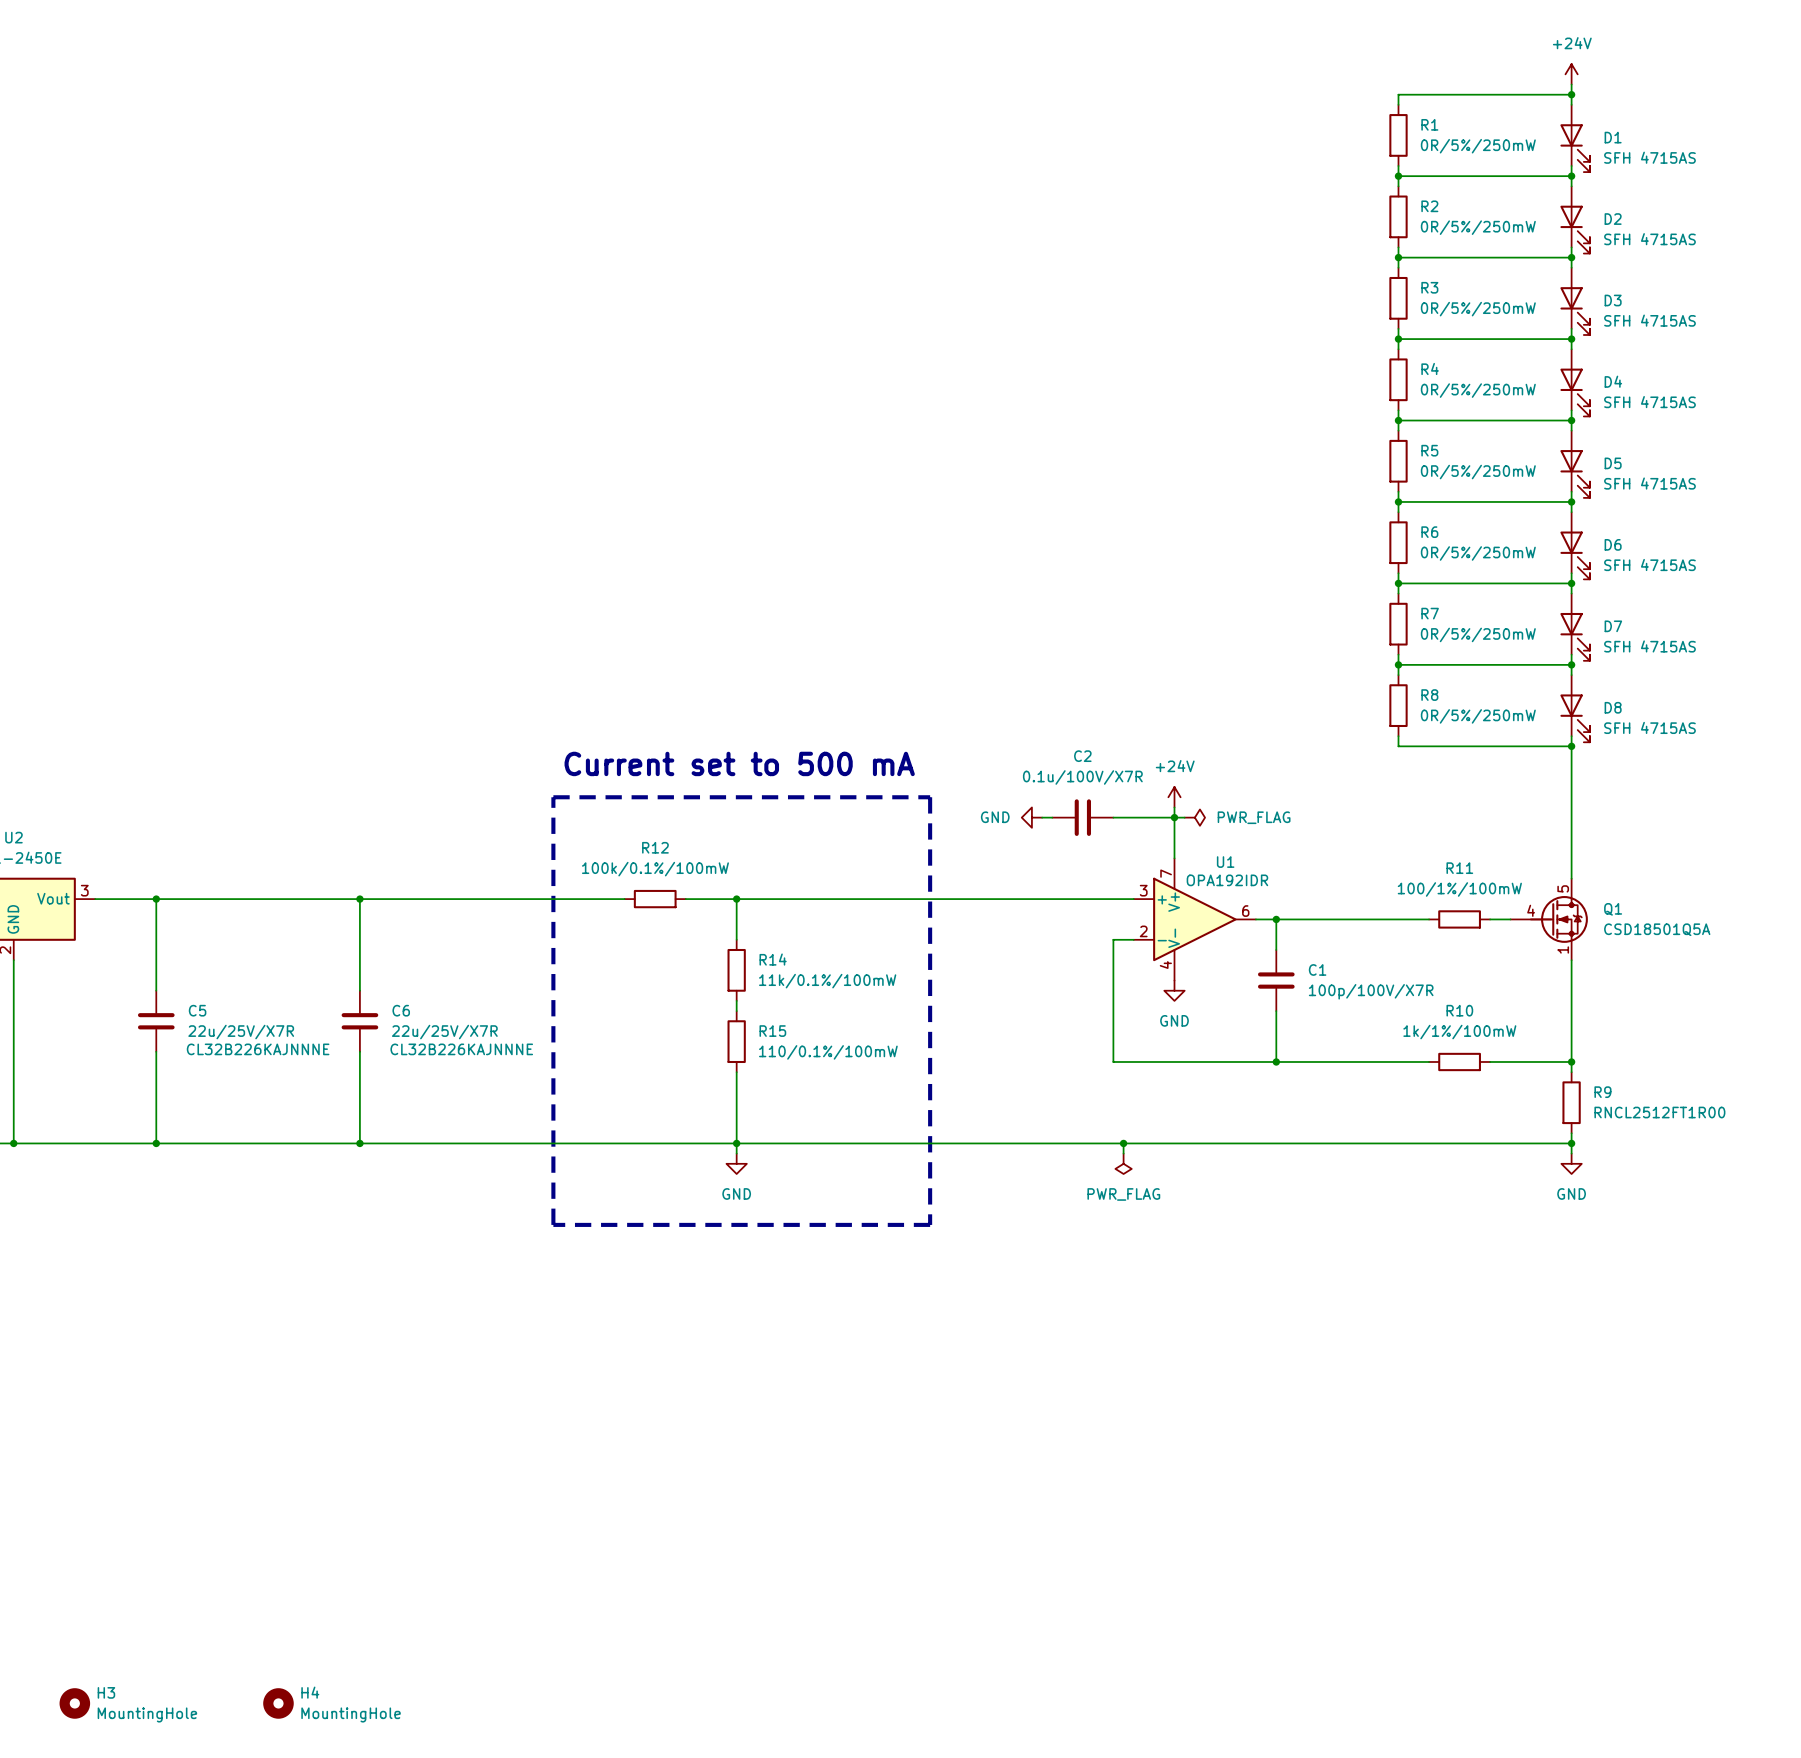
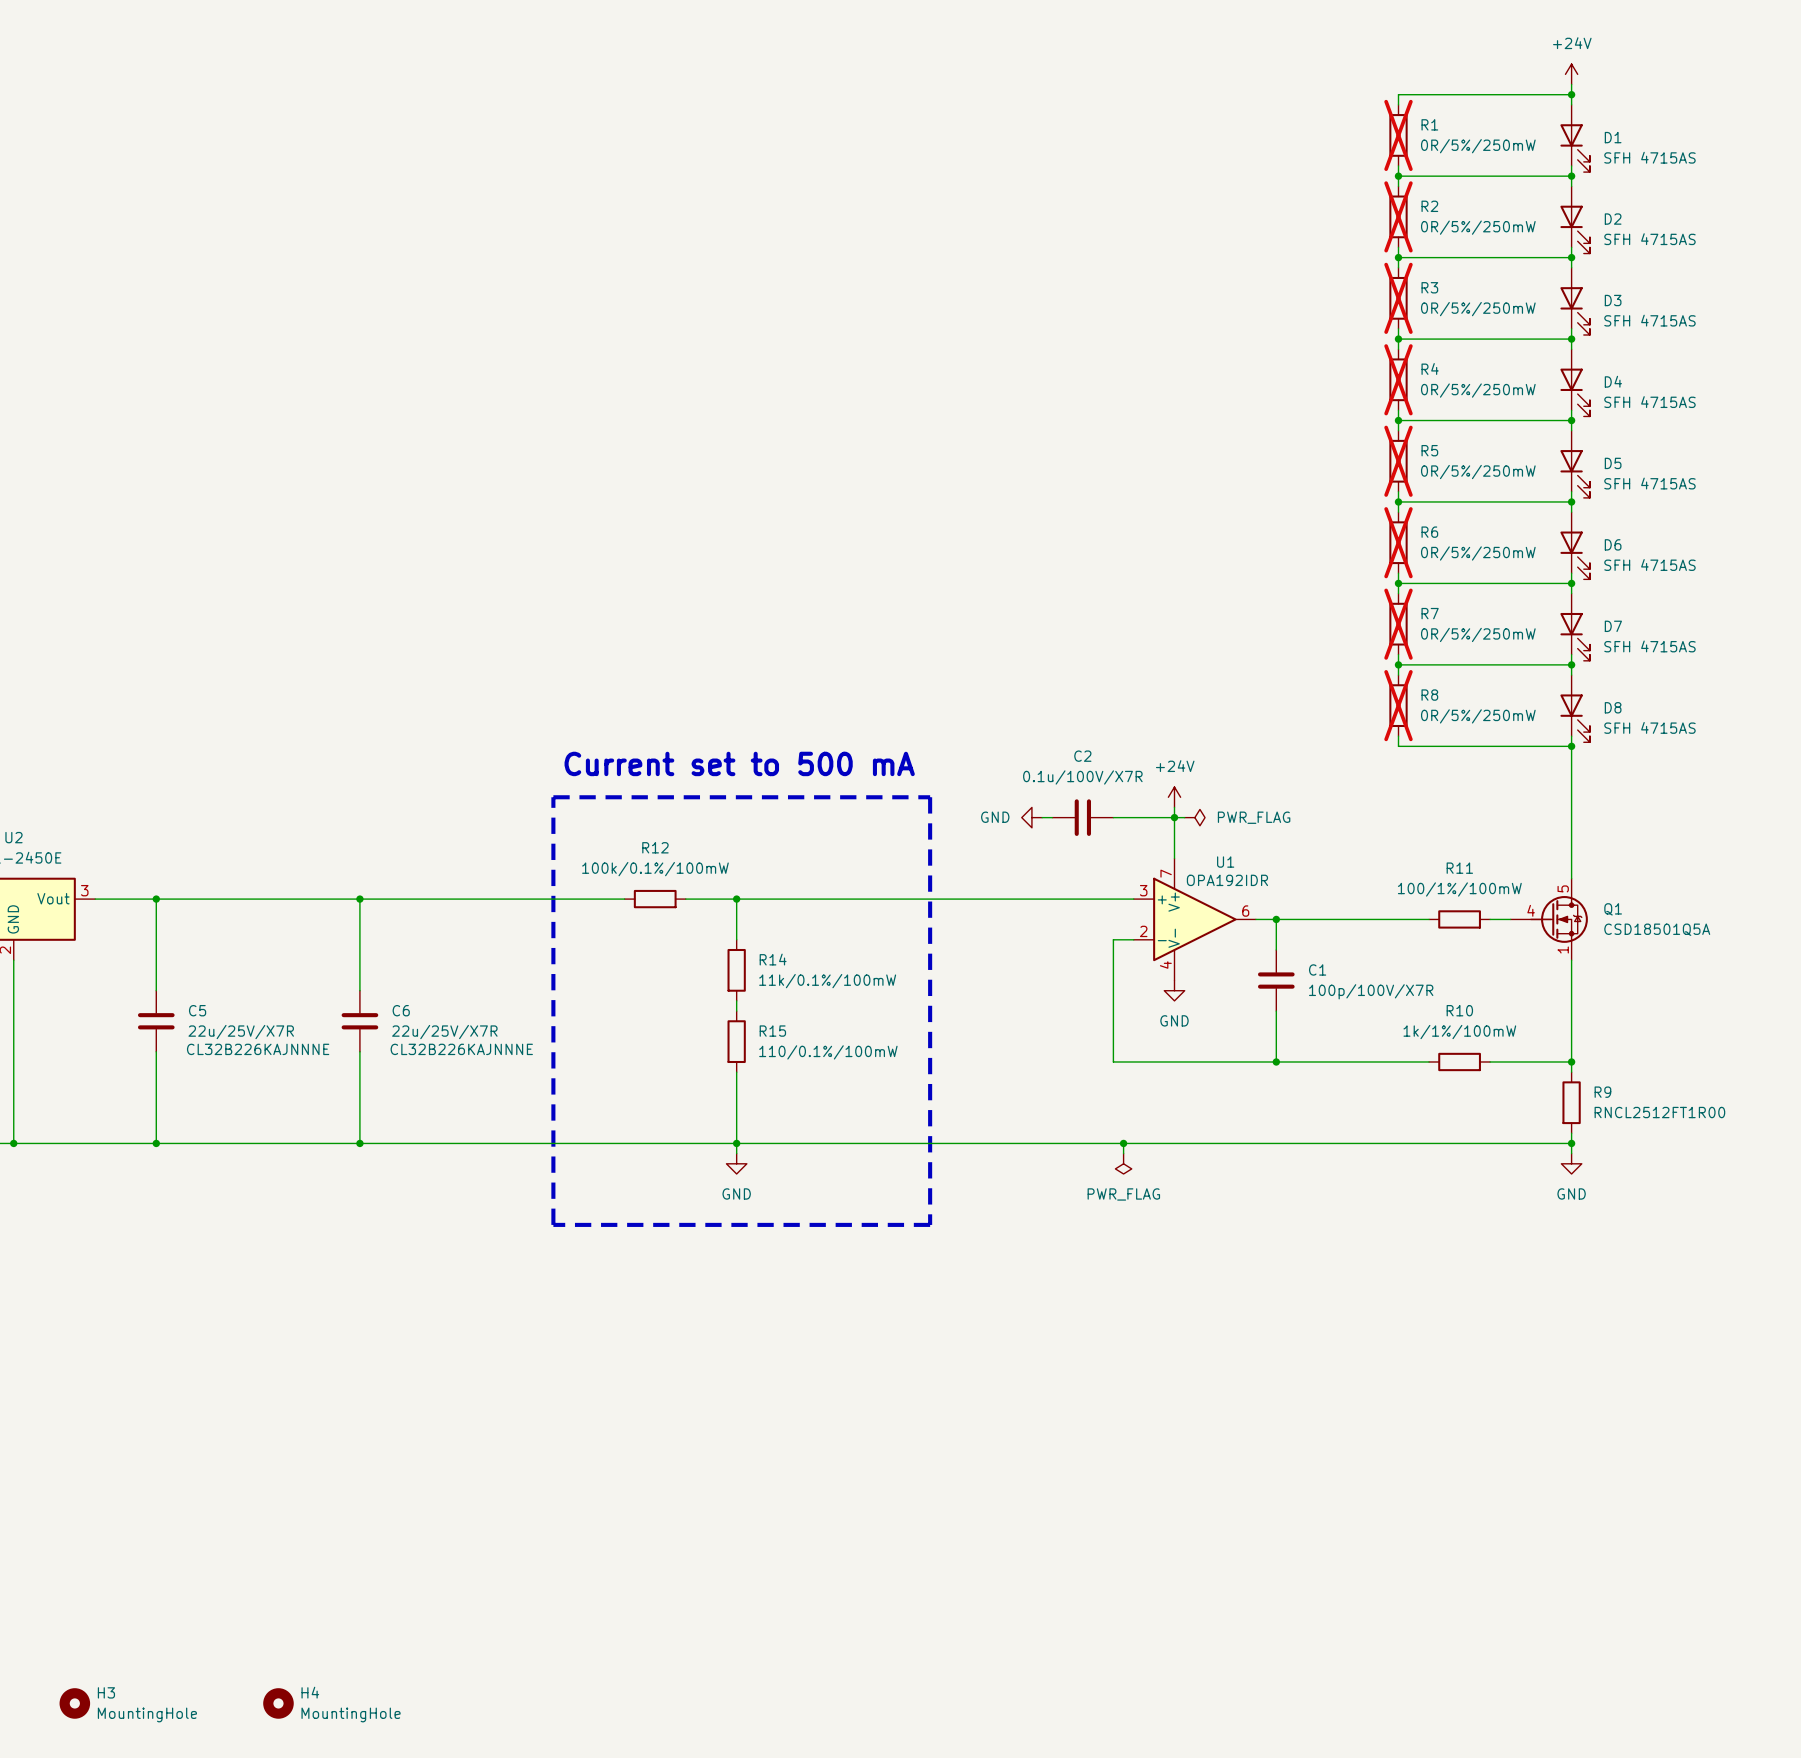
R1 do-not-place cross: none -> (1398, 135)
R2 do-not-place cross: none -> (1398, 216)
R3 do-not-place cross: none -> (1398, 298)
R4 do-not-place cross: none -> (1398, 379)
R5 do-not-place cross: none -> (1398, 461)
R6 do-not-place cross: none -> (1398, 542)
R7 do-not-place cross: none -> (1398, 624)
R8 do-not-place cross: none -> (1398, 705)

